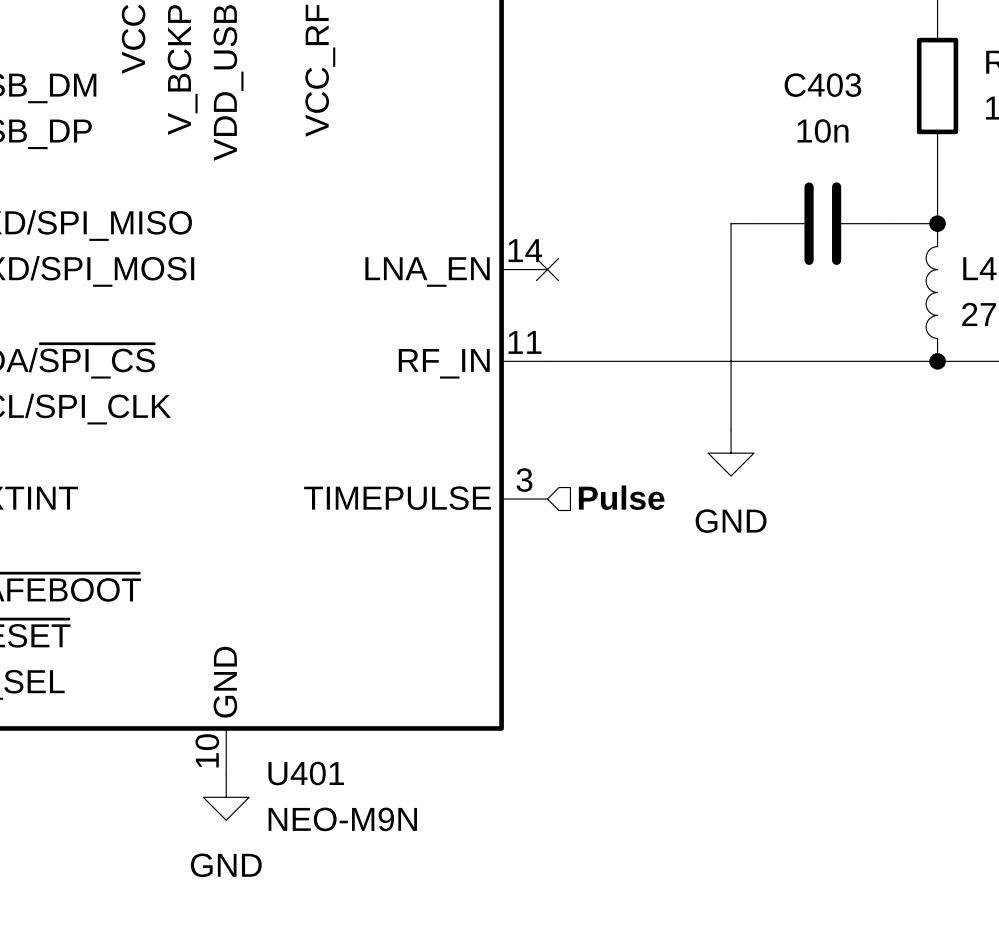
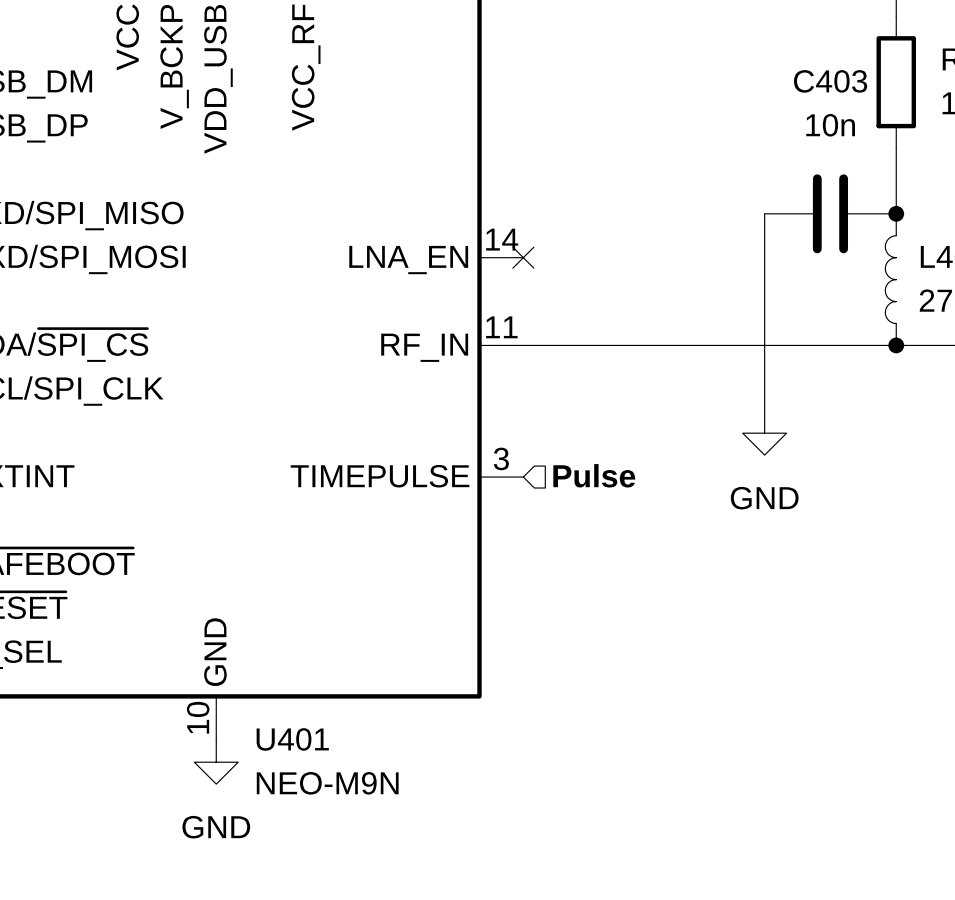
wire: (753, 223) (731, 223) (731, 430) -> none
wire: none -> (764, 213) (764, 411)
C403 position: (822, 223) -> (830, 213)
power symbol position: GND (731, 453) -> GND (764, 433)

